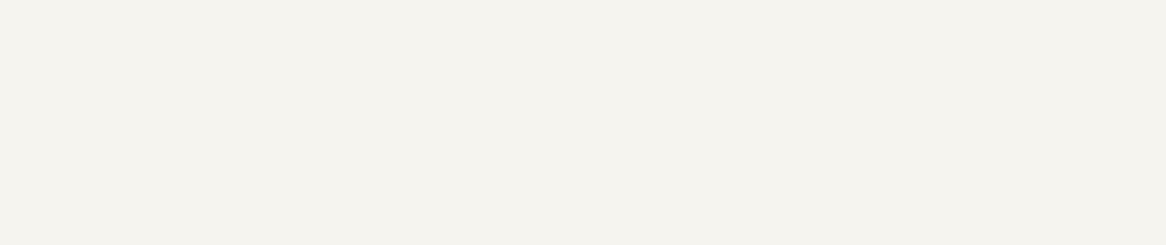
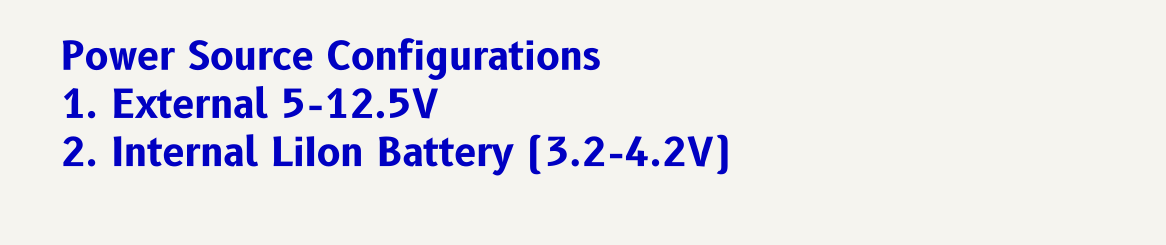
text: none -> Power Source Configurations (331, 59)
text: none -> 1. External 5-12.5V (250, 102)
text: none -> 2. Internal LiIon Battery (3.2-4.2V) (395, 154)

